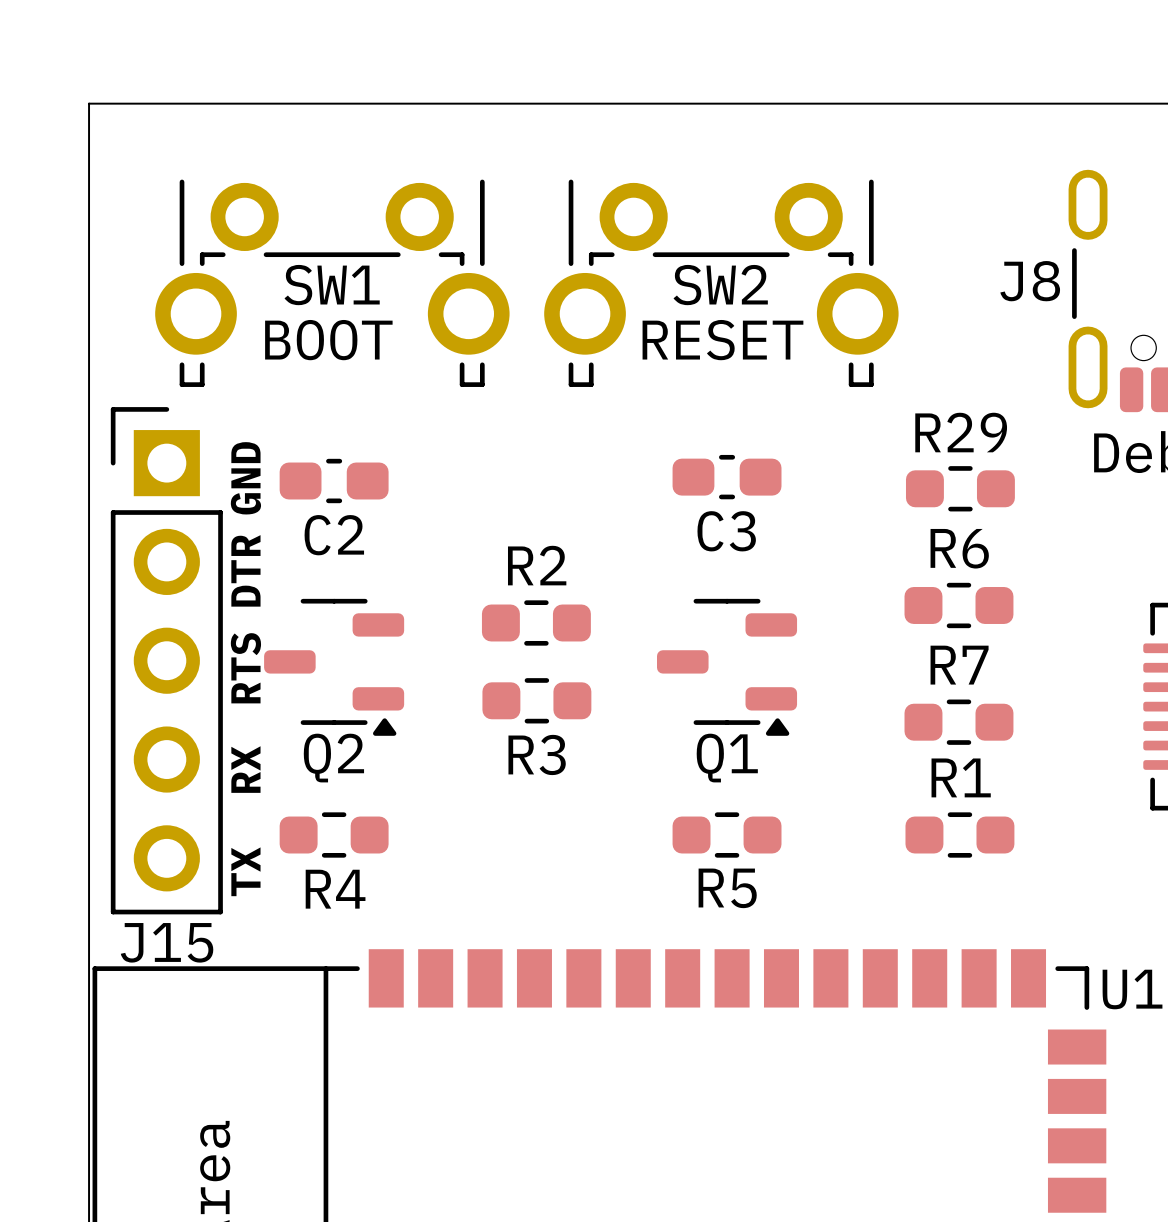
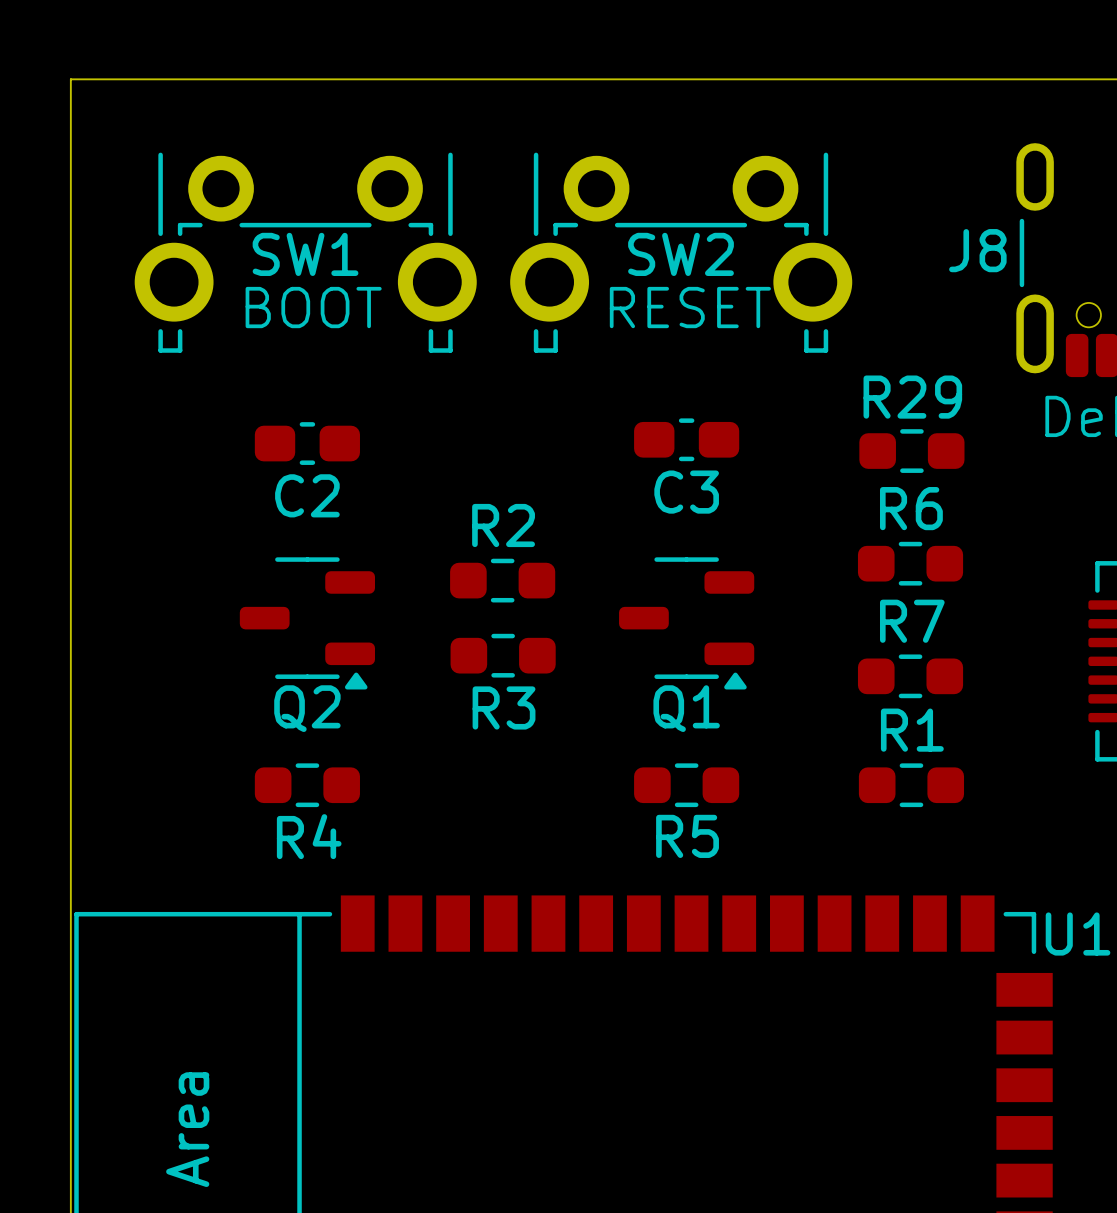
text: GND (245, 478) -> none
text: DTR (245, 570) -> none
J15: (166, 660) -> none
text: RTS (245, 668) -> none
text: RX (245, 769) -> none
text: TX (245, 871) -> none

